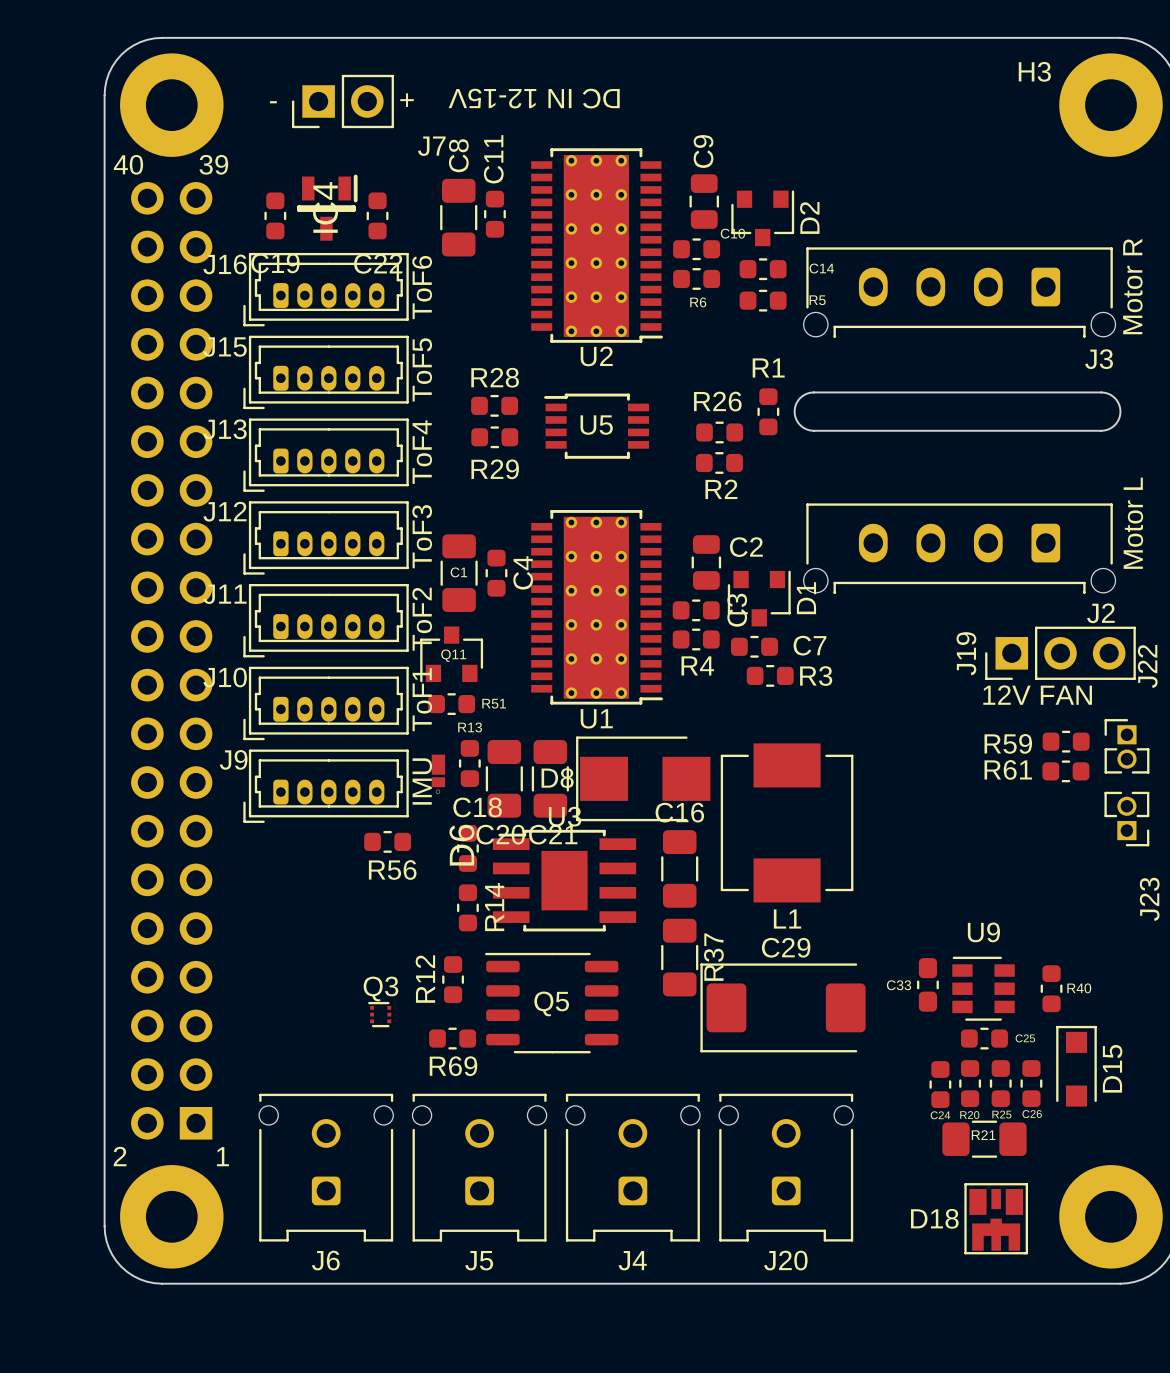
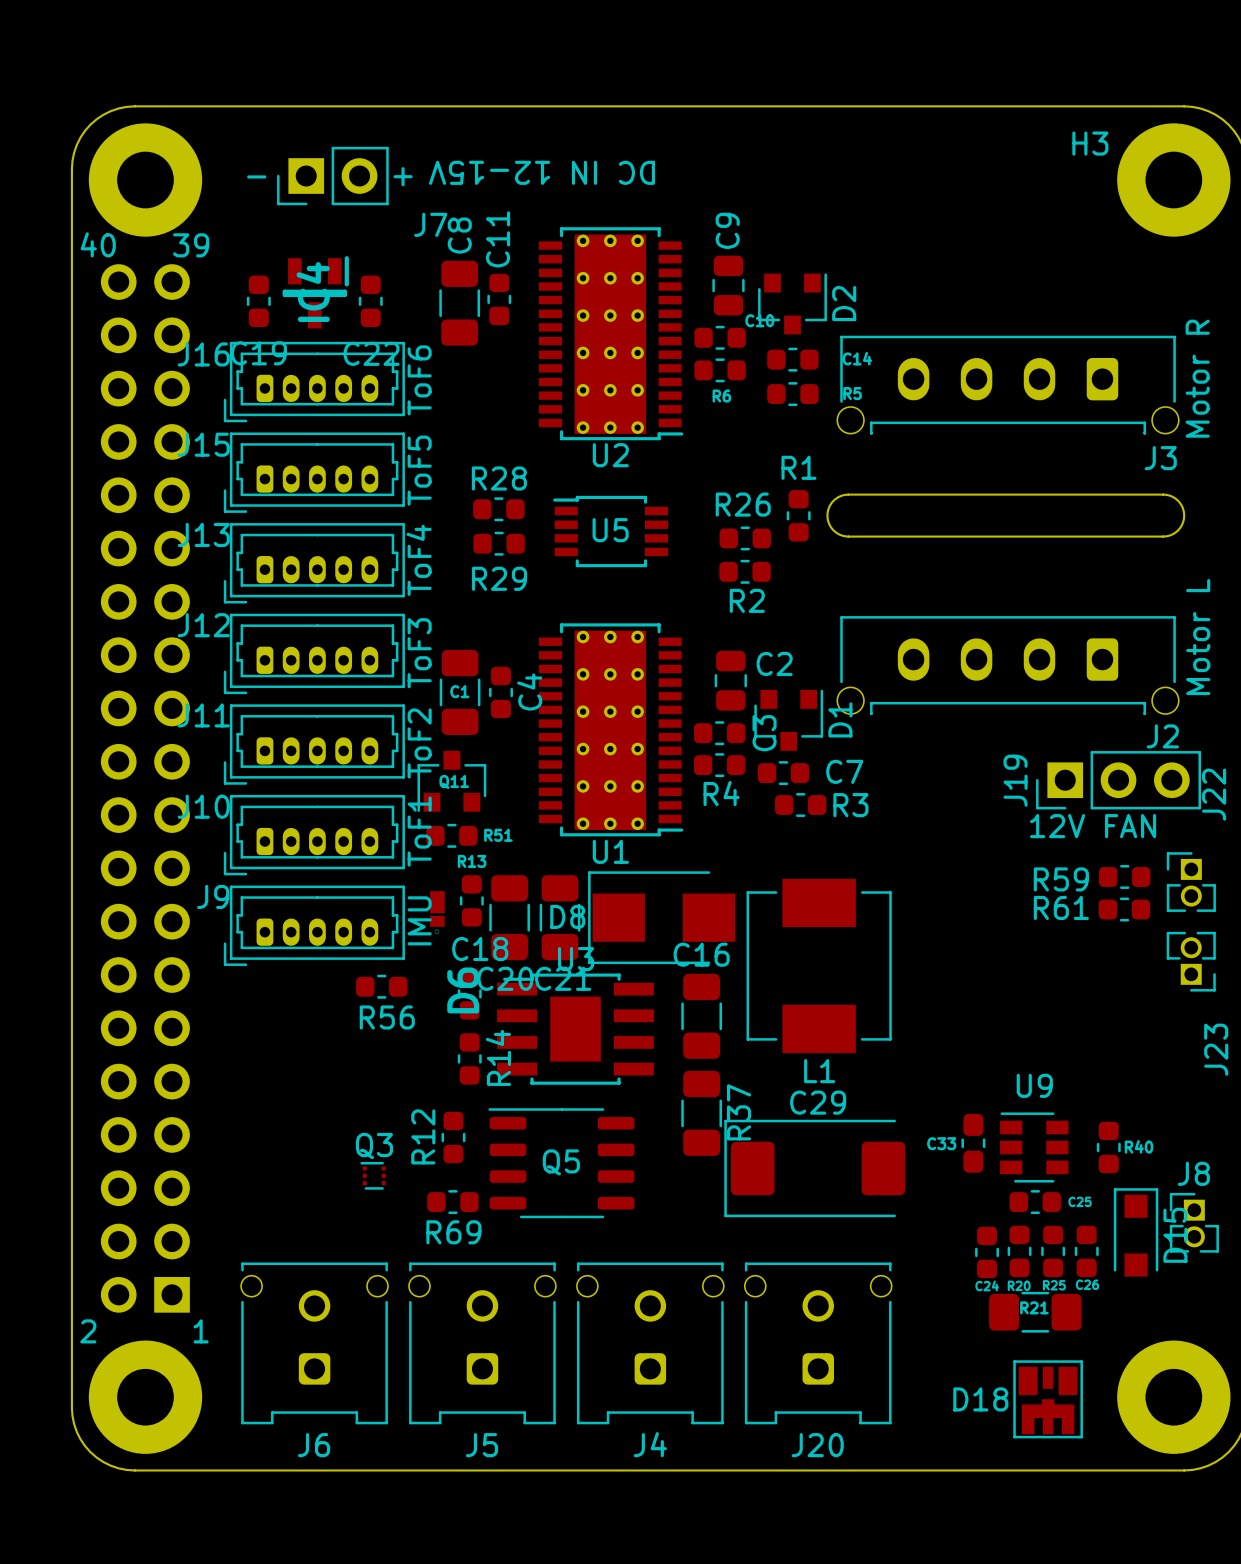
J8: none -> (1194, 1222)

